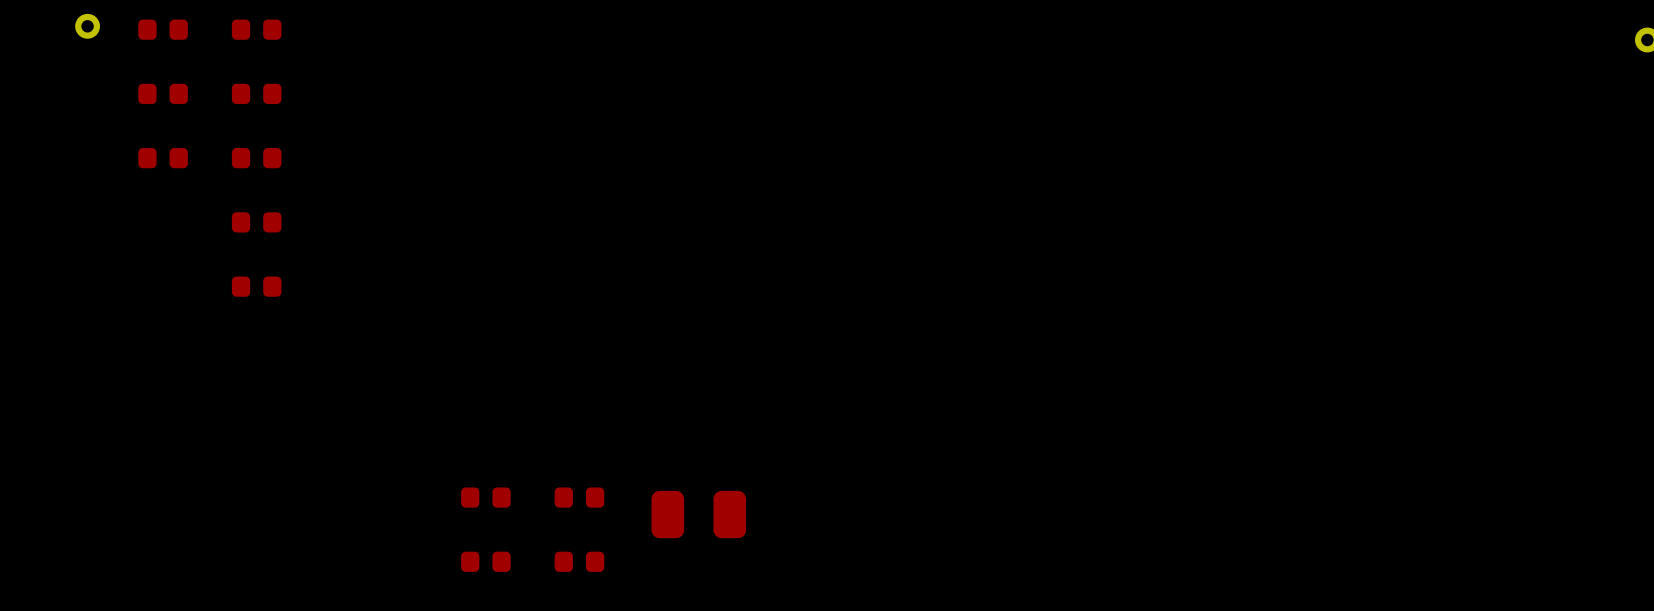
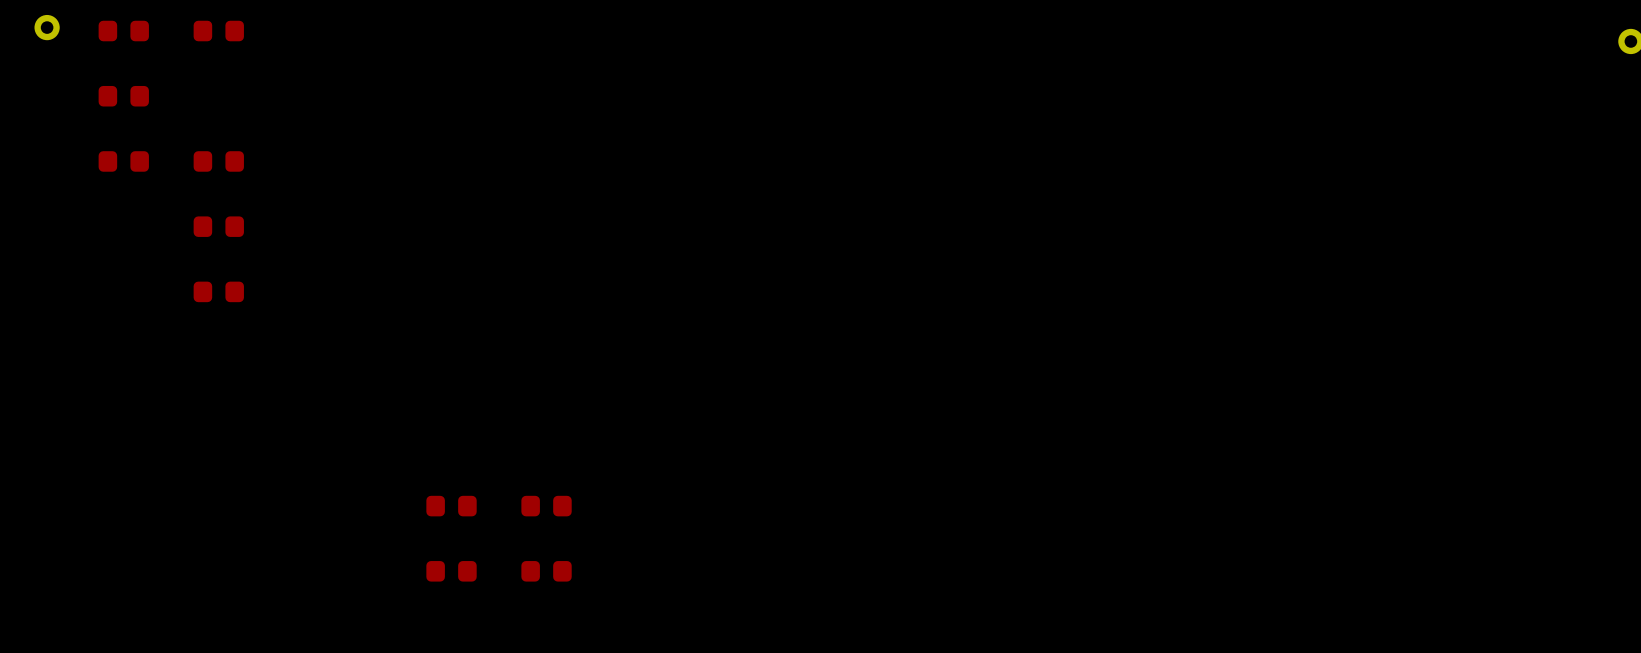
part: (256, 93) -> none
part: (698, 514) -> none

